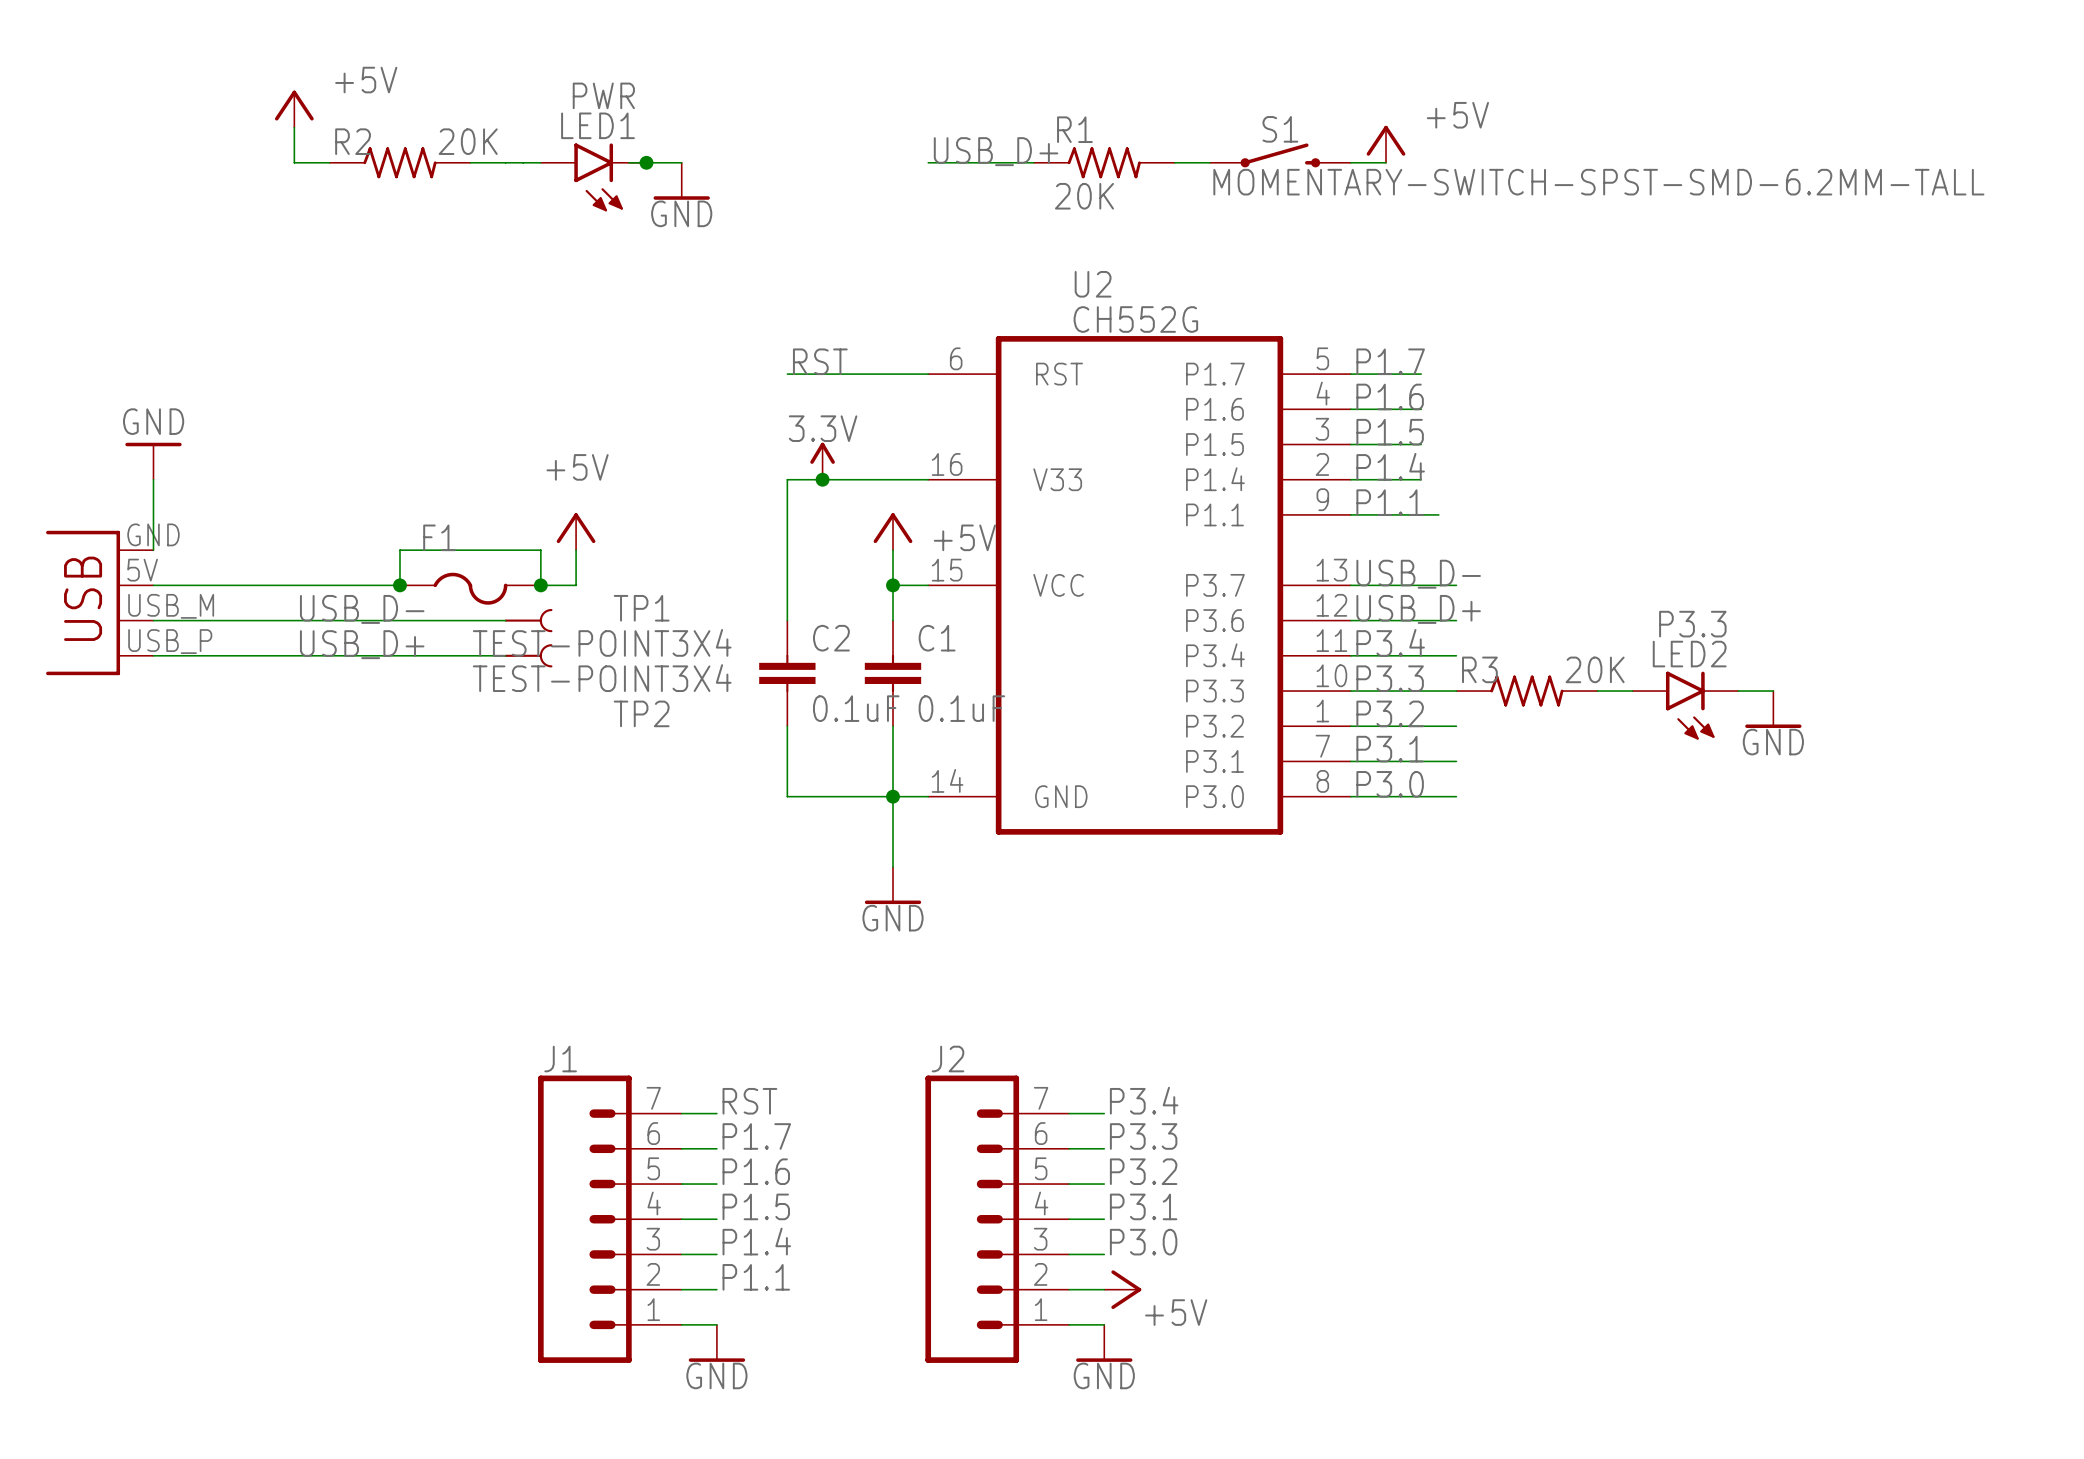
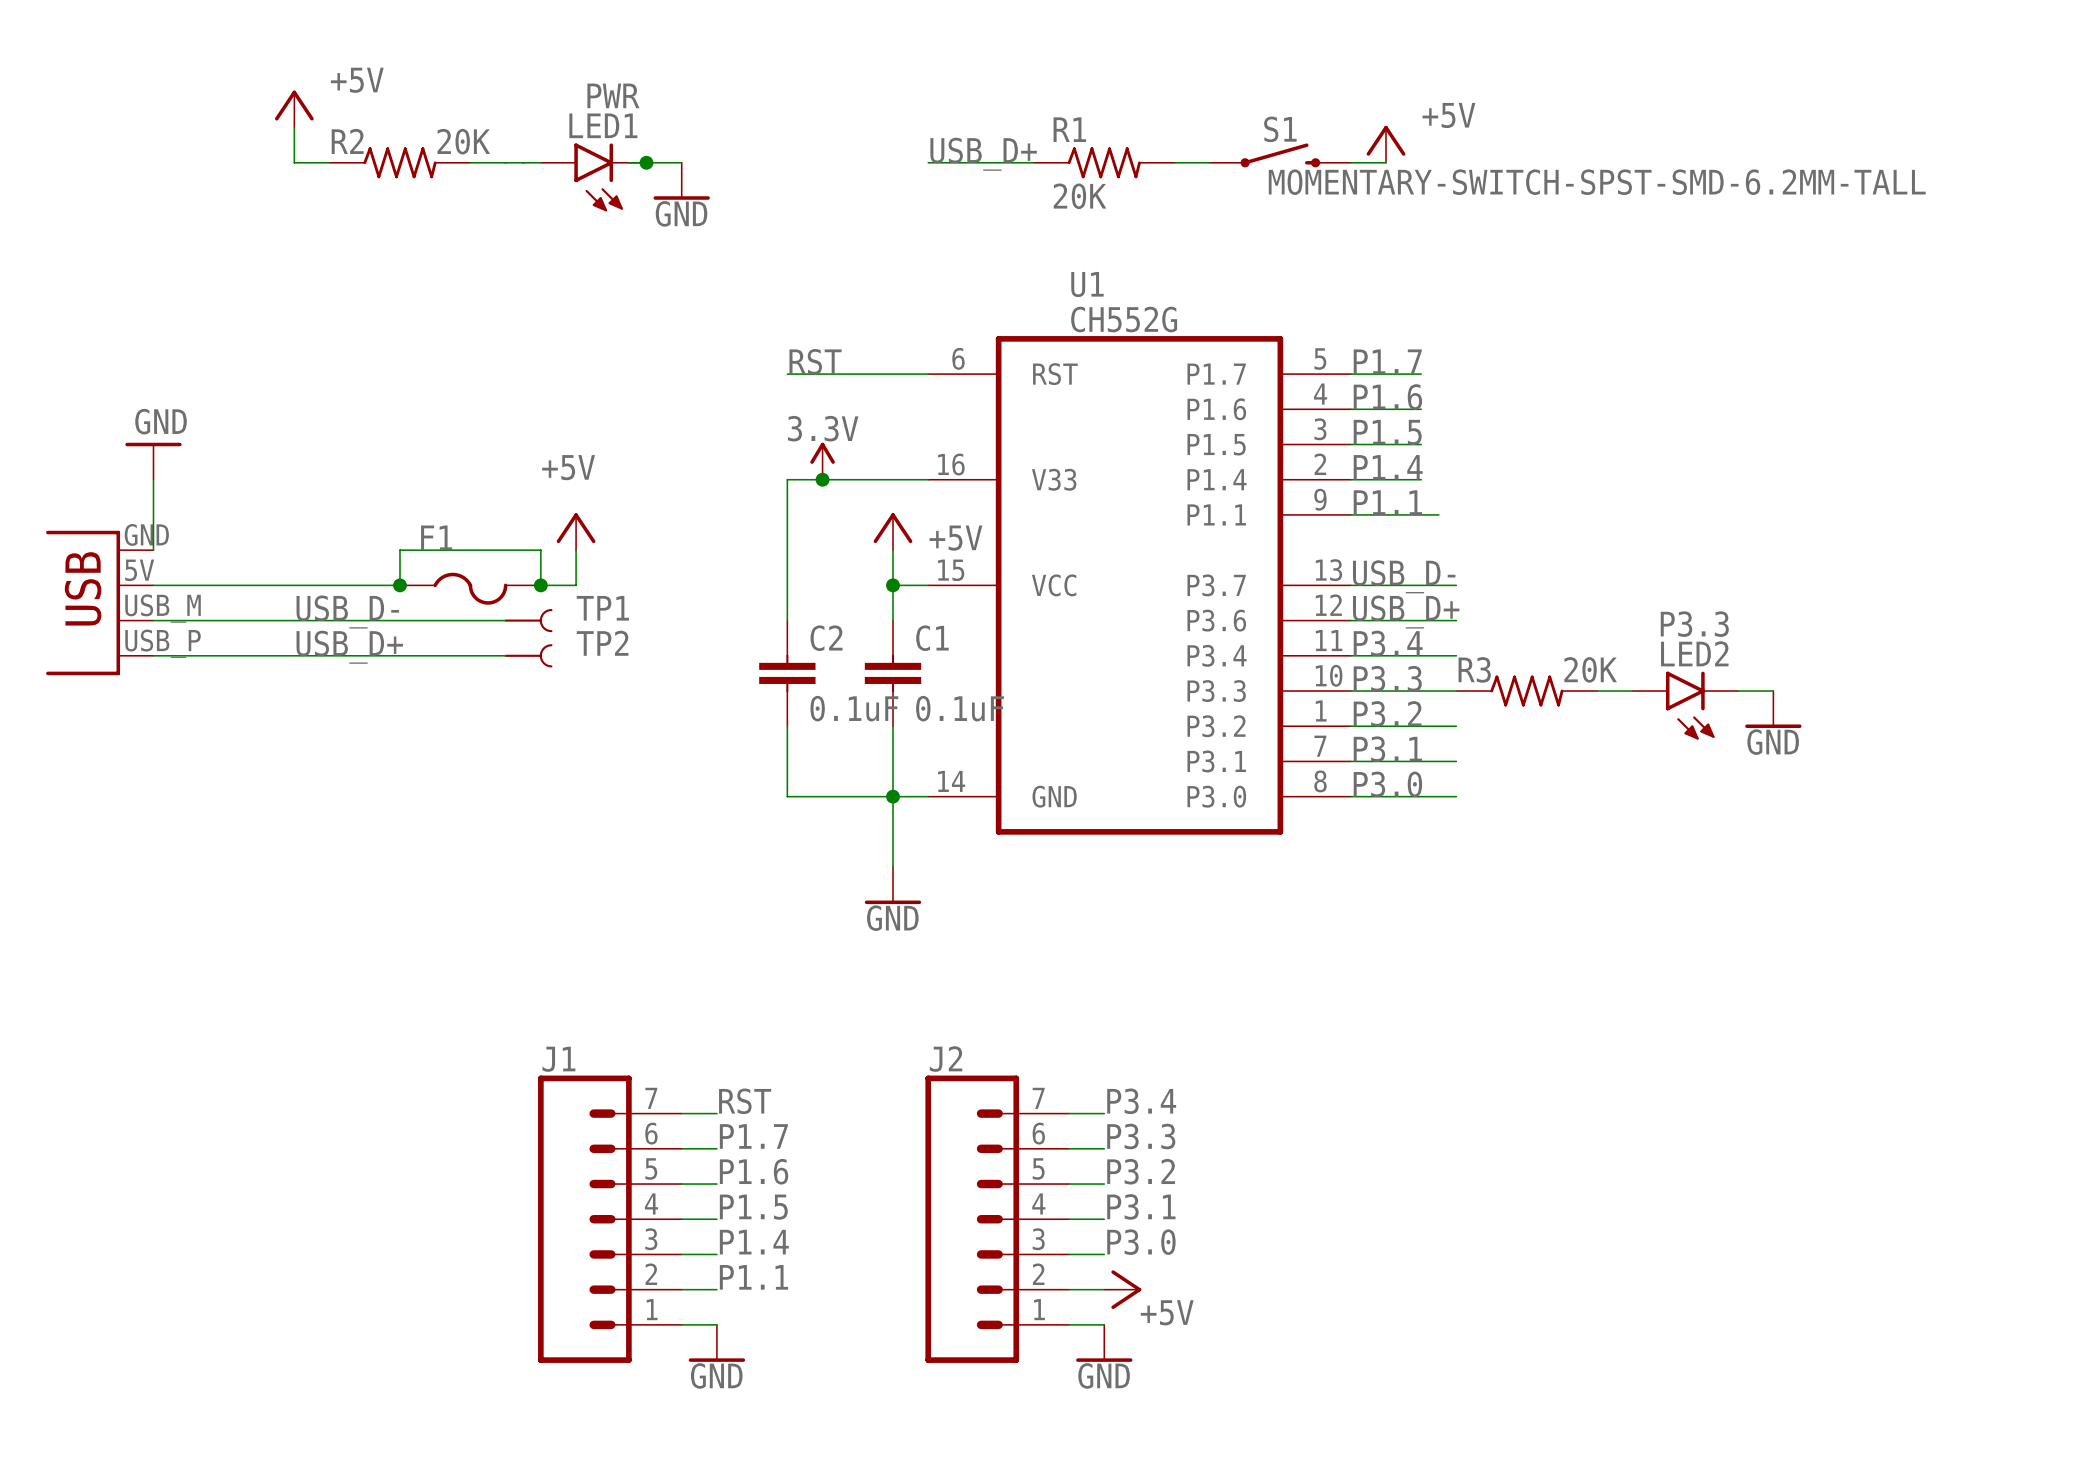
U2 name: U2 (1093, 284) -> U1 (1087, 284)
TP1 name position: TP1 (641, 608) -> TP1 (602, 608)
TP1 value: TEST-POINT3X4 (602, 642) -> none
TP2 value: TEST-POINT3X4 (602, 678) -> none
TP2 name position: TP2 (641, 713) -> TP2 (602, 643)

